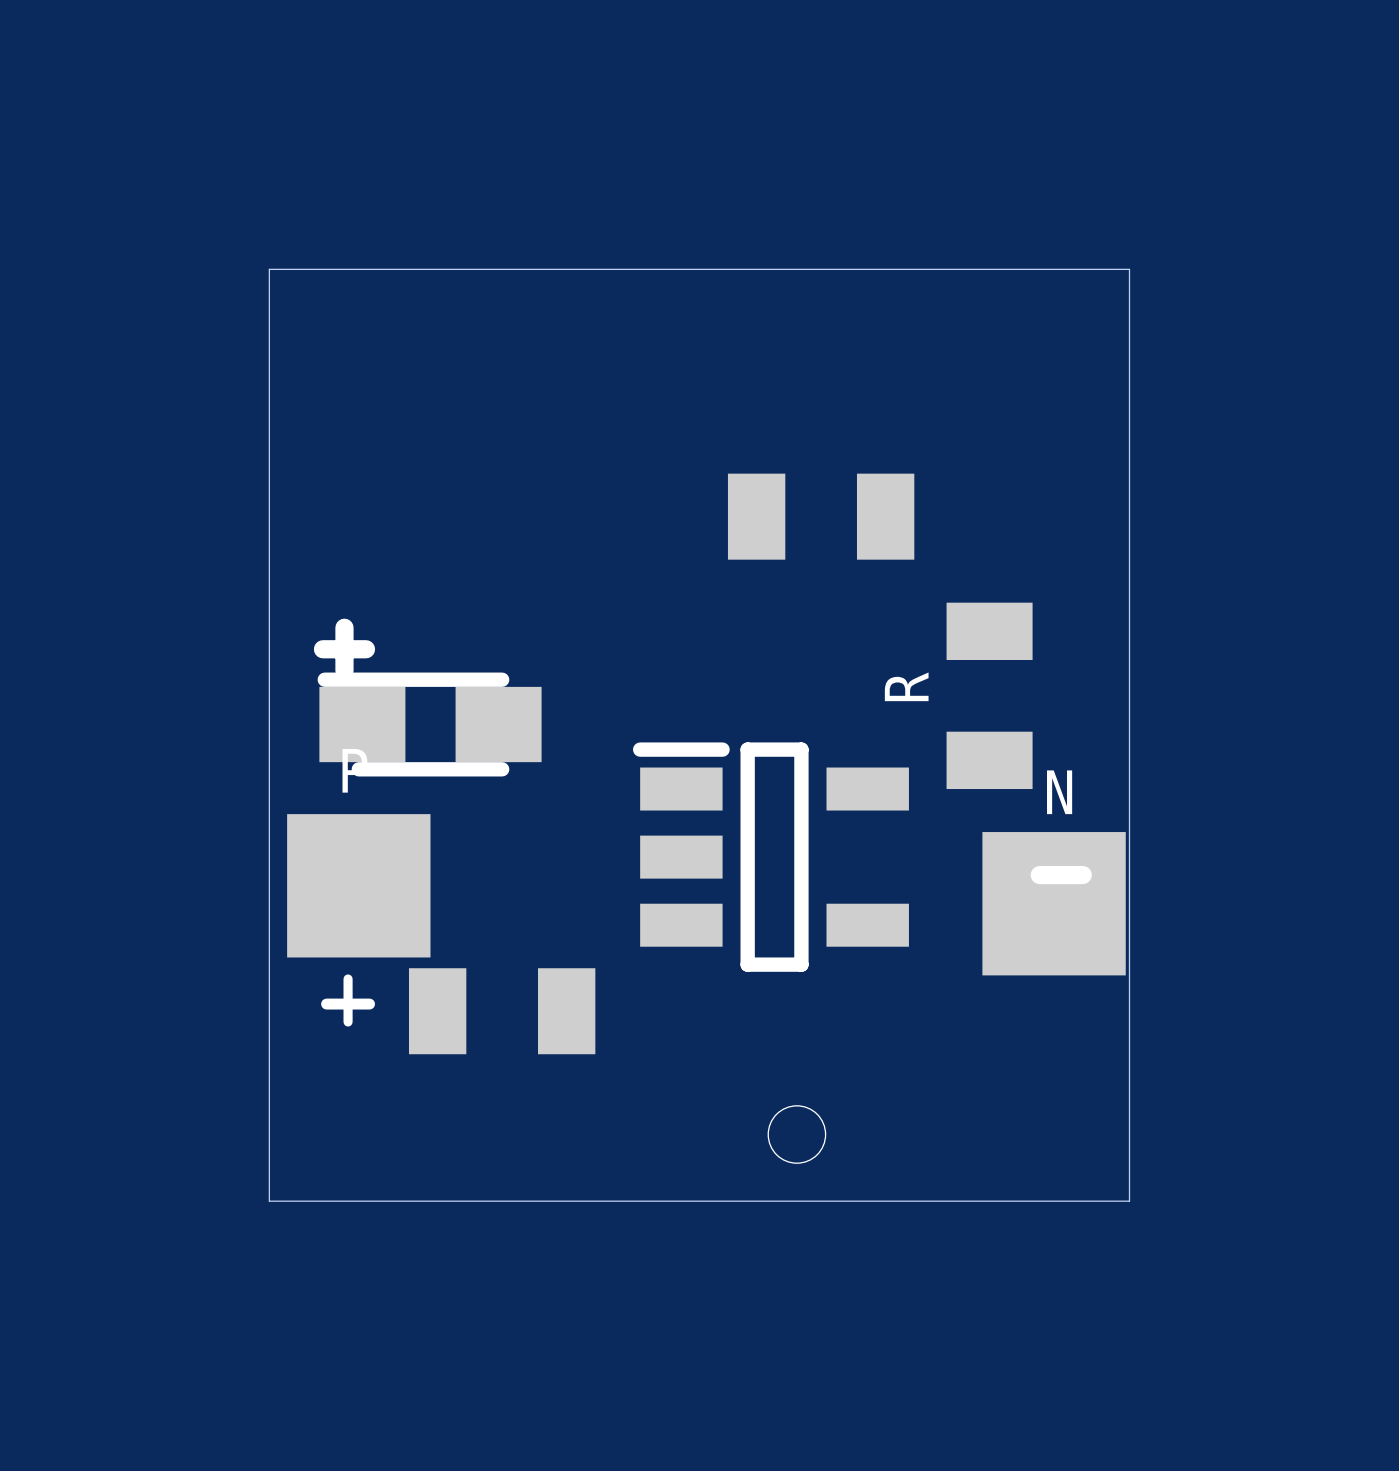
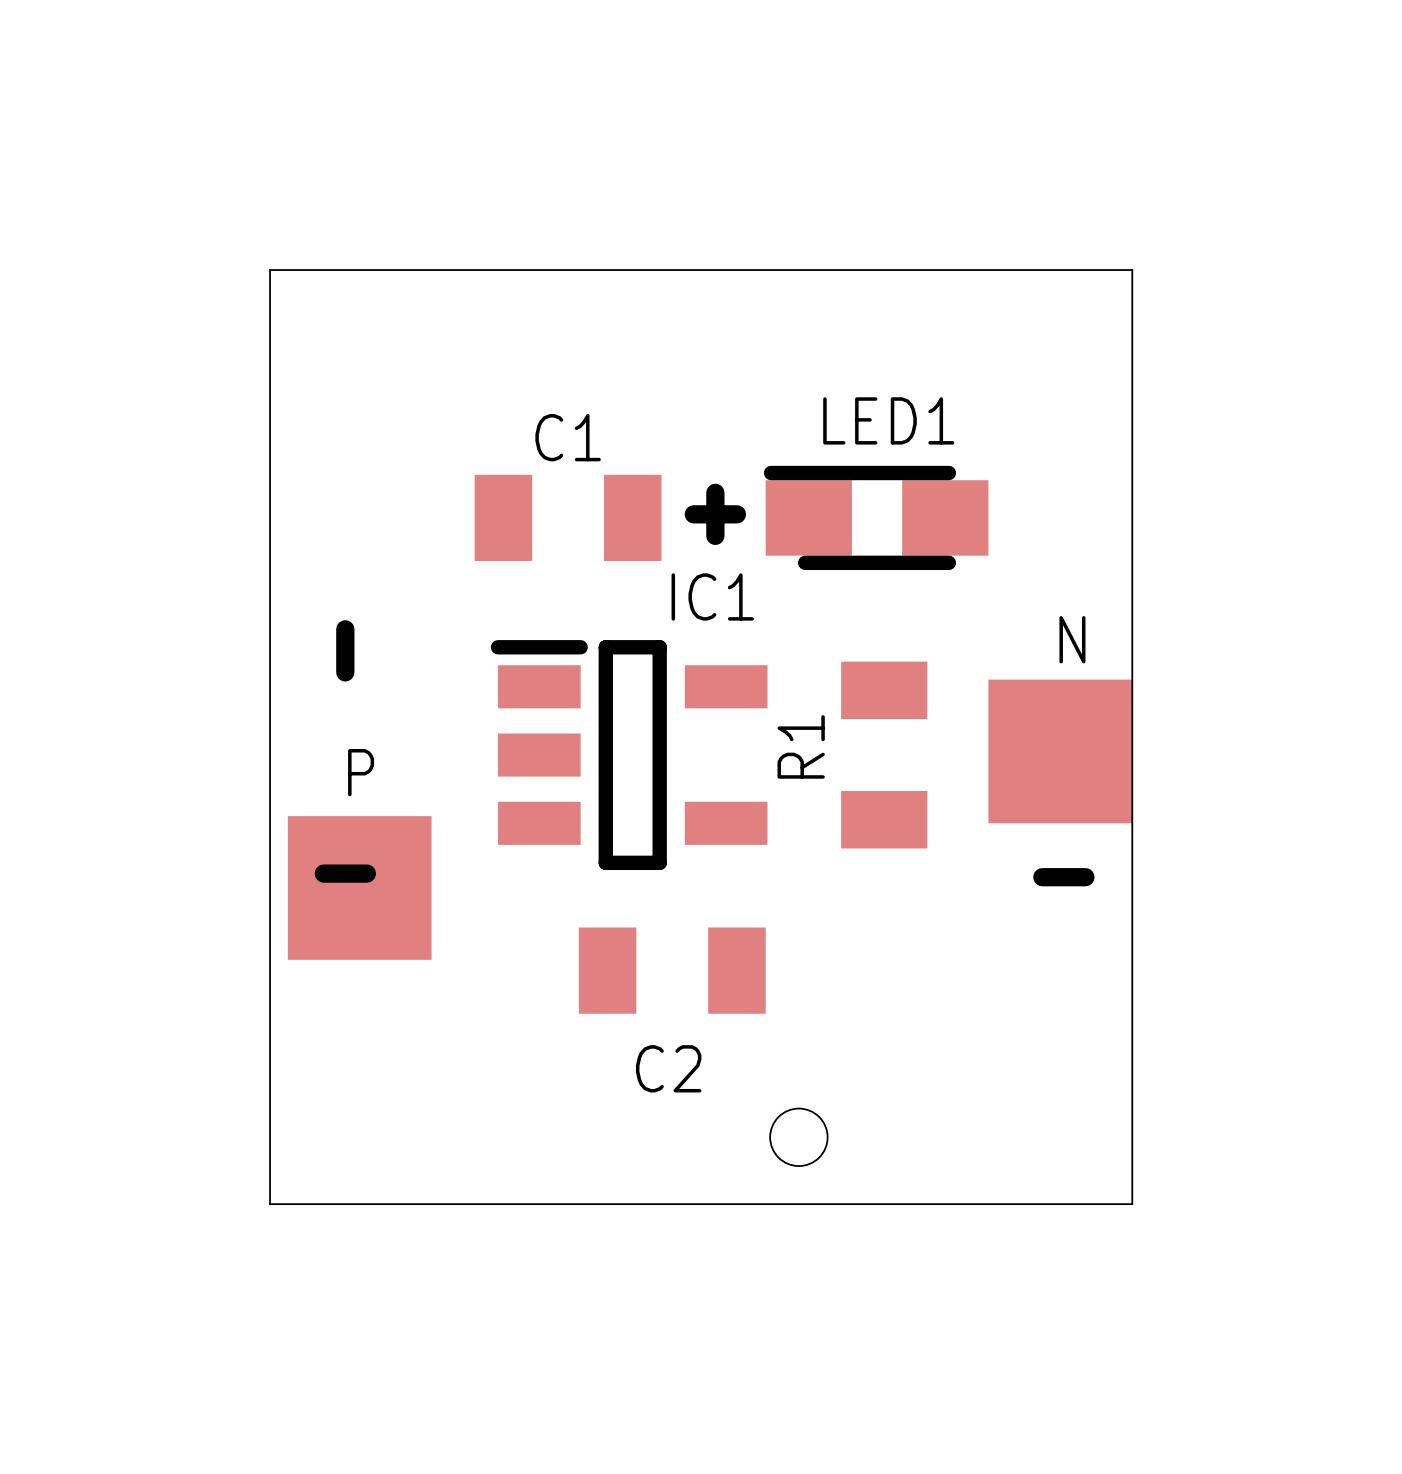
C1: none -> (568, 517)
part: (821, 516) -> none
LED1: none -> (876, 517)
line: (322, 649) (365, 649) -> (693, 514) (736, 514)
R: (989, 695) -> none
part: (429, 724) -> none
IC1: none -> (629, 755)
R1: none -> (884, 755)
part: (770, 857) -> none
N position: (1054, 903) -> (1060, 751)
C2: none -> (672, 970)
line: (348, 978) (348, 1021) -> (715, 492) (715, 535)
line: (326, 1004) (369, 1004) -> (323, 873) (366, 873)
part: (502, 1011) -> none

